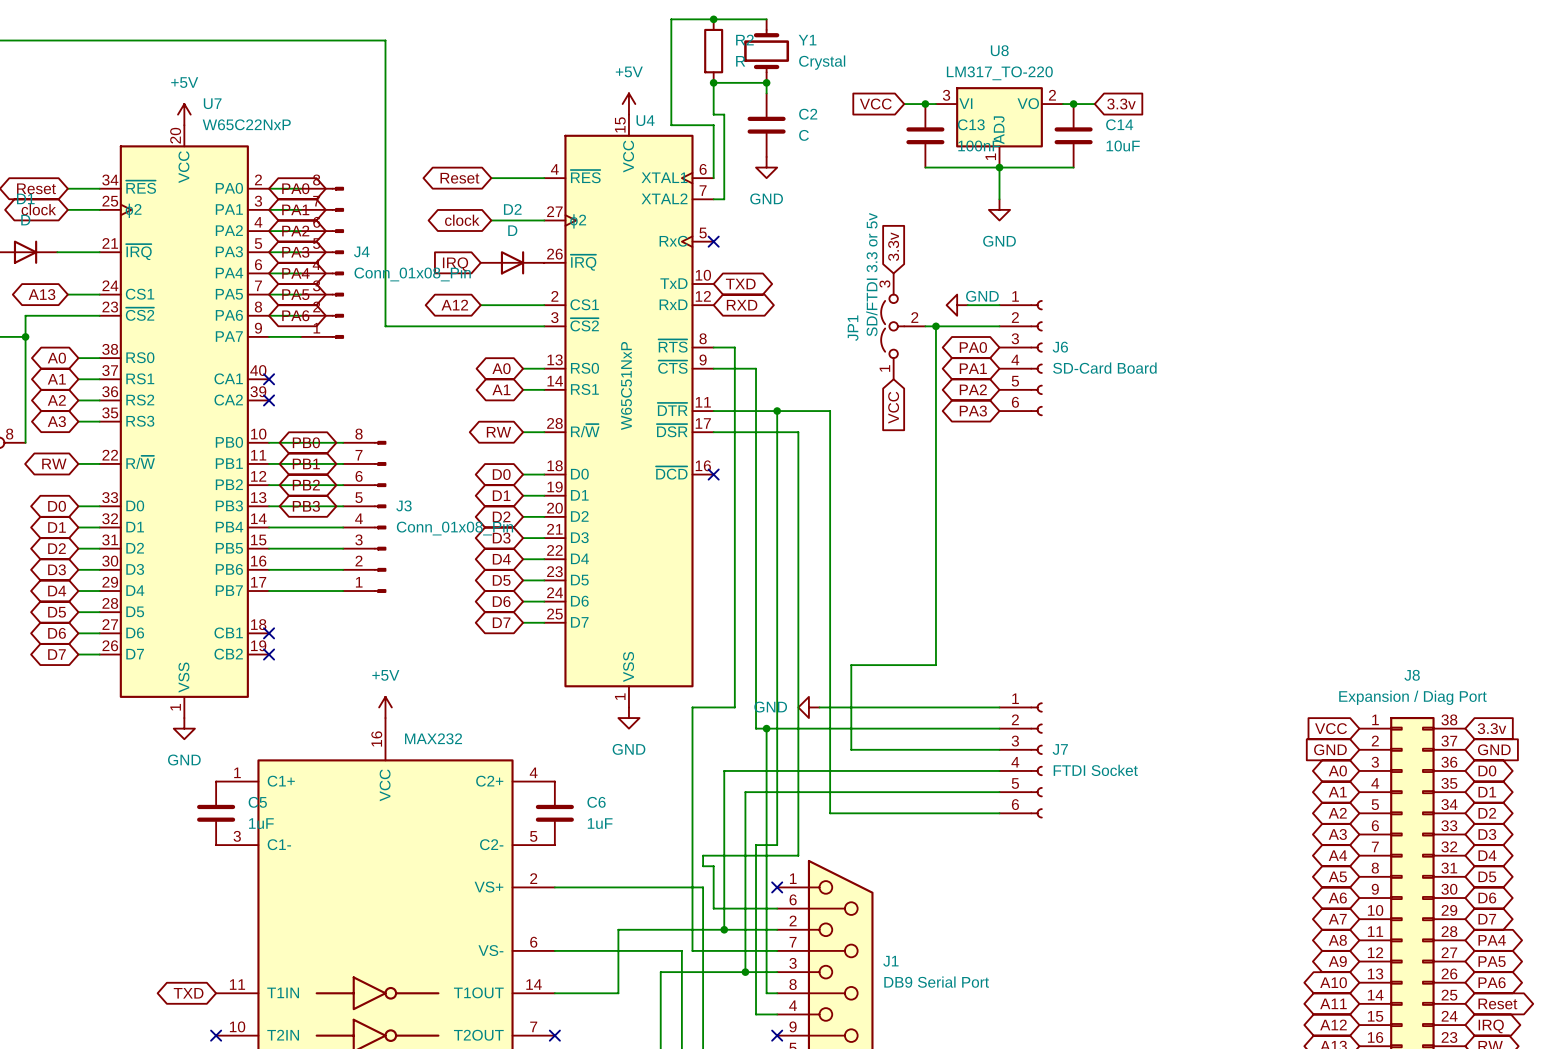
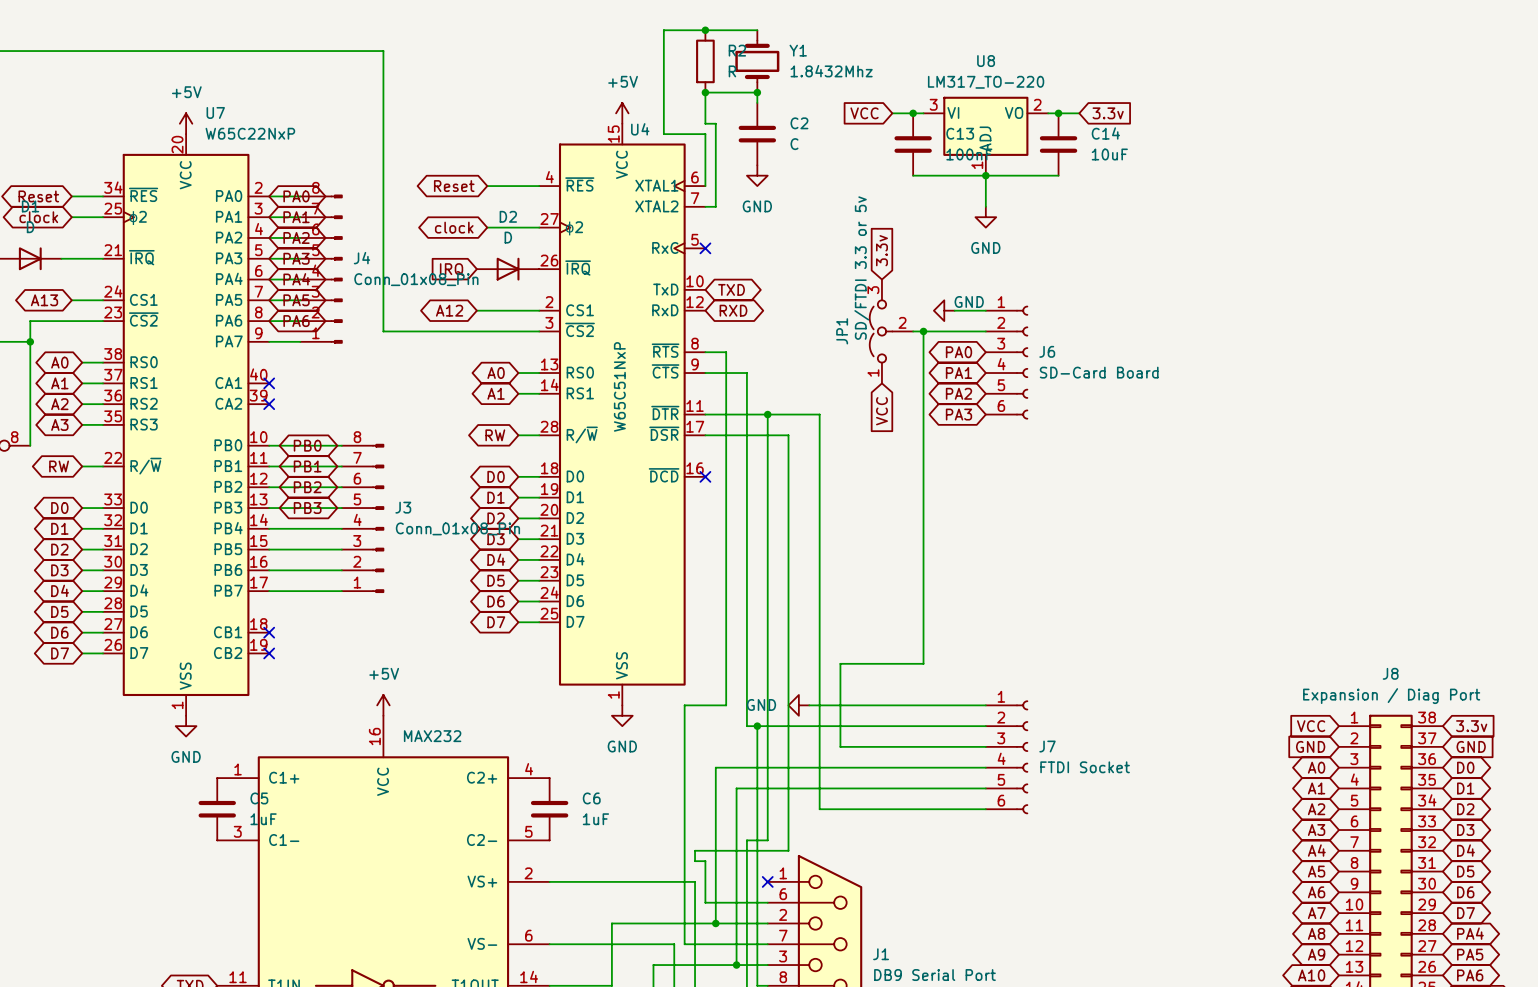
Y1 value: Crystal (822, 62) -> 1.8432Mhz (831, 71)

